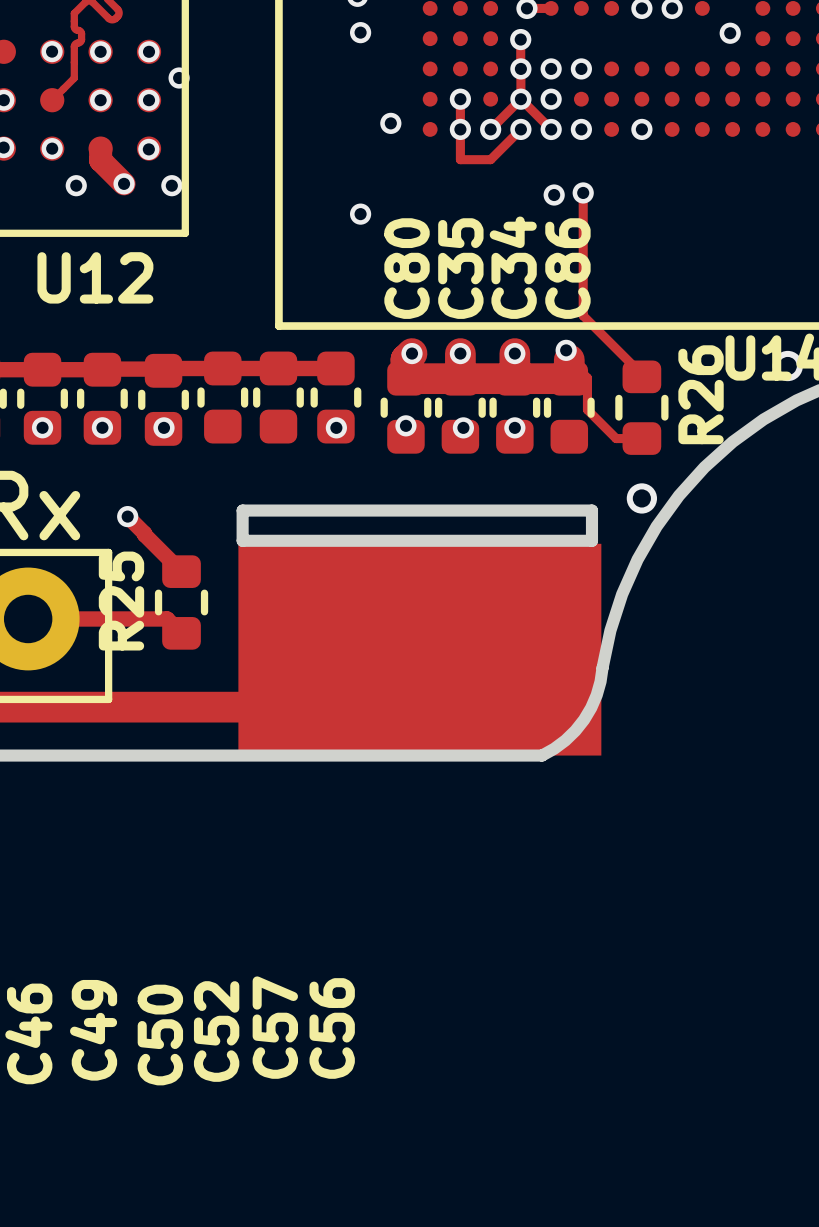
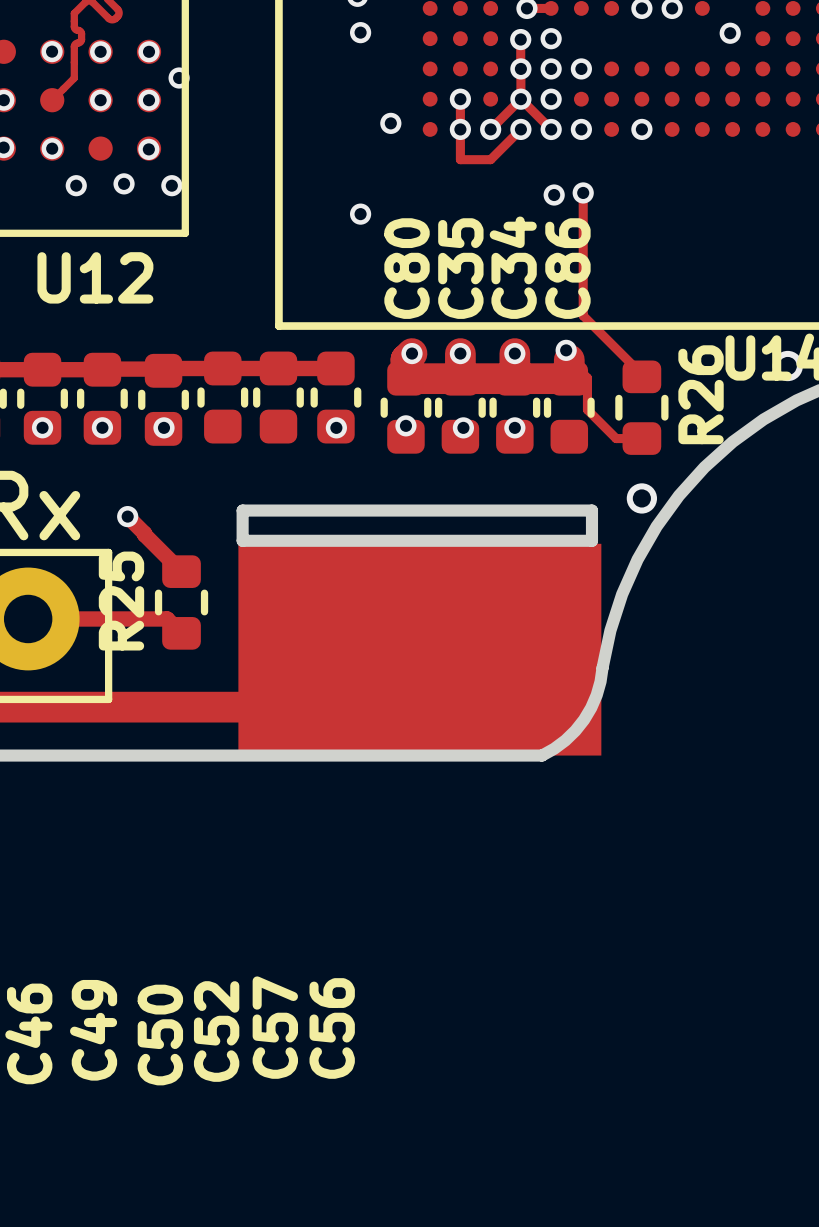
via: none -> (551, 38)
track: (100, 148) (100, 160) (124, 183) -> none

